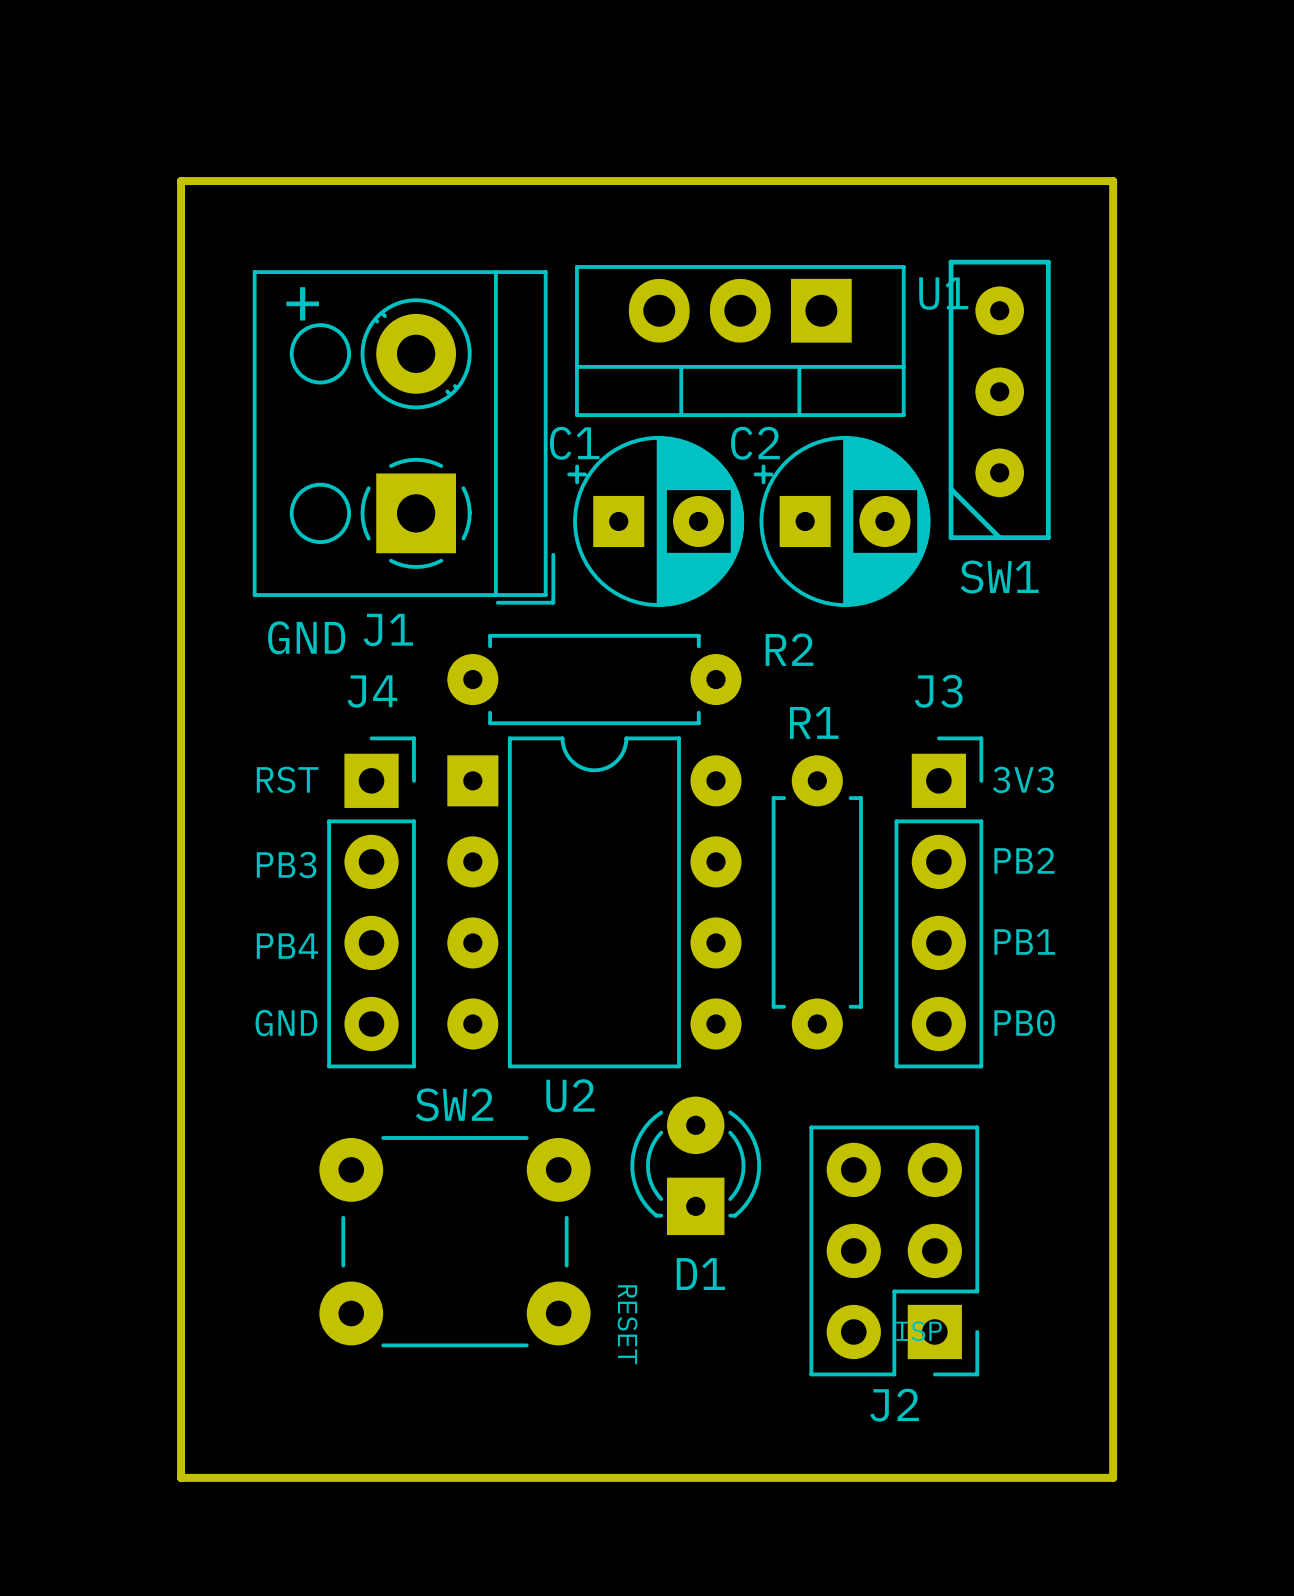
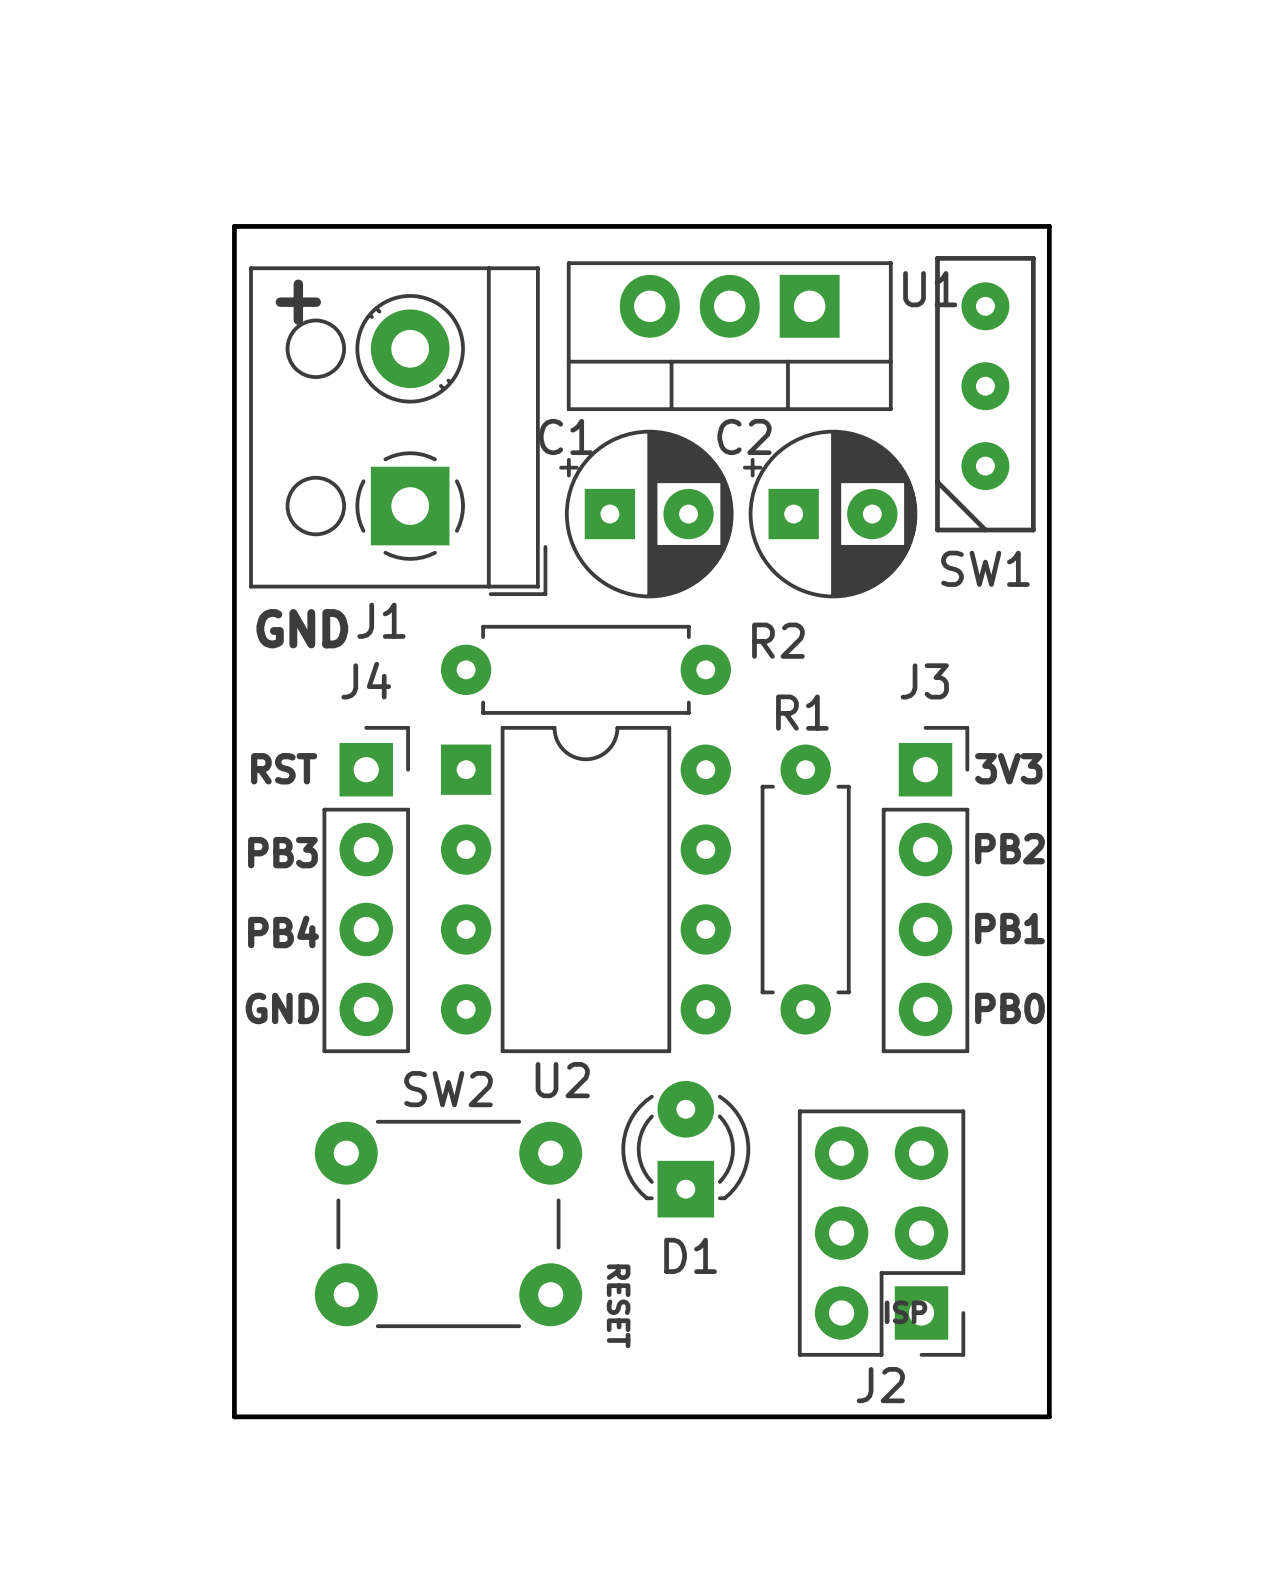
board edge: (181, 181) (181, 1477) (1113, 1477) (1113, 181) (181, 181) -> (234, 226) (234, 1416) (1049, 1416) (1049, 226) (234, 226)

